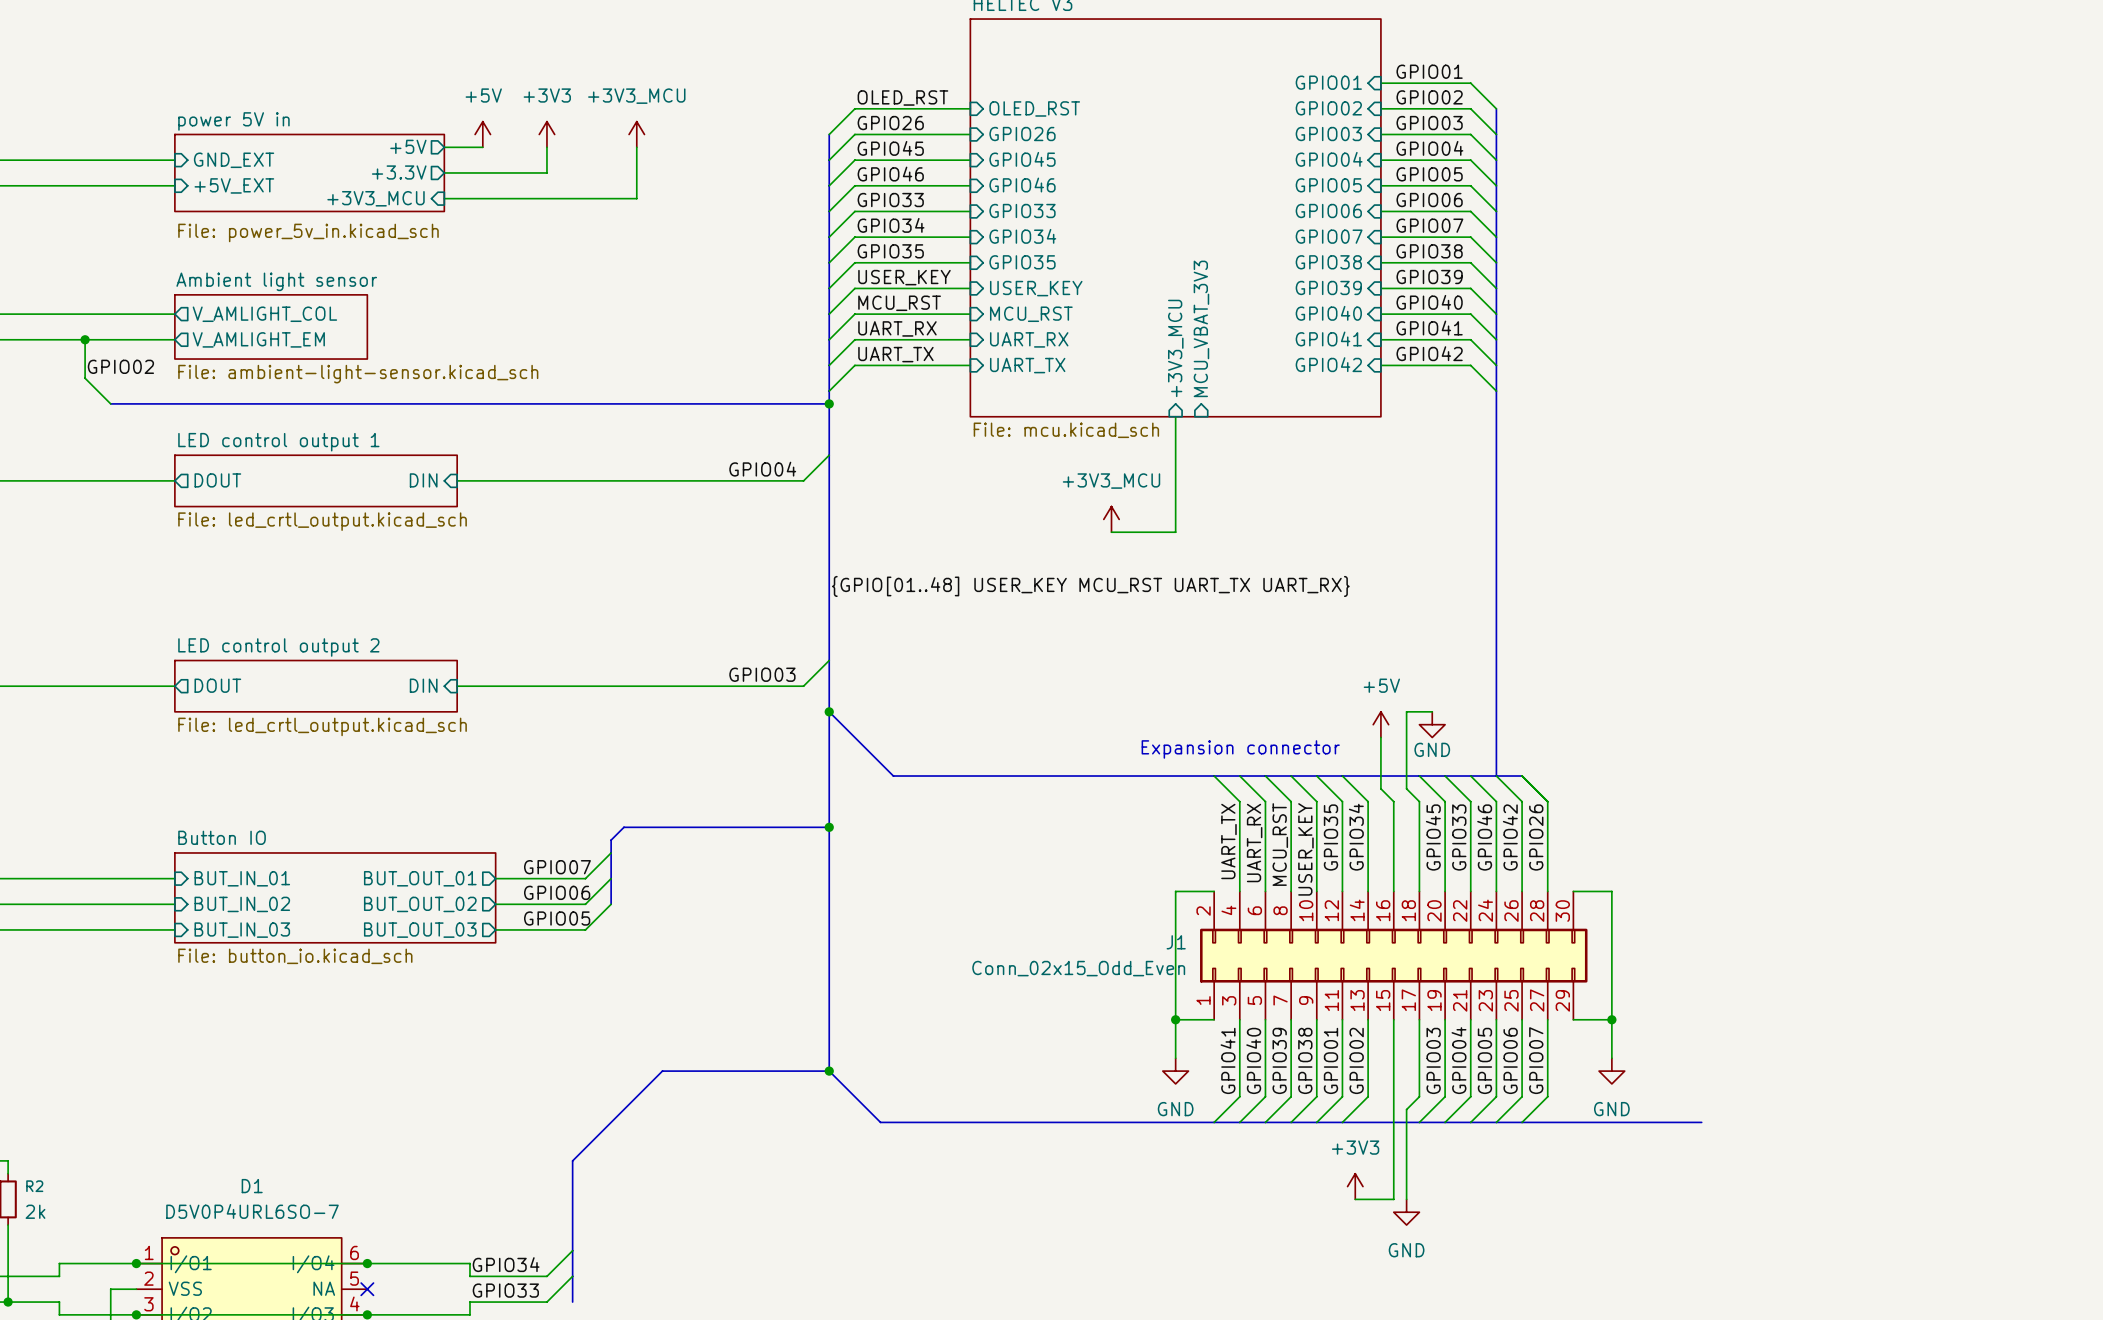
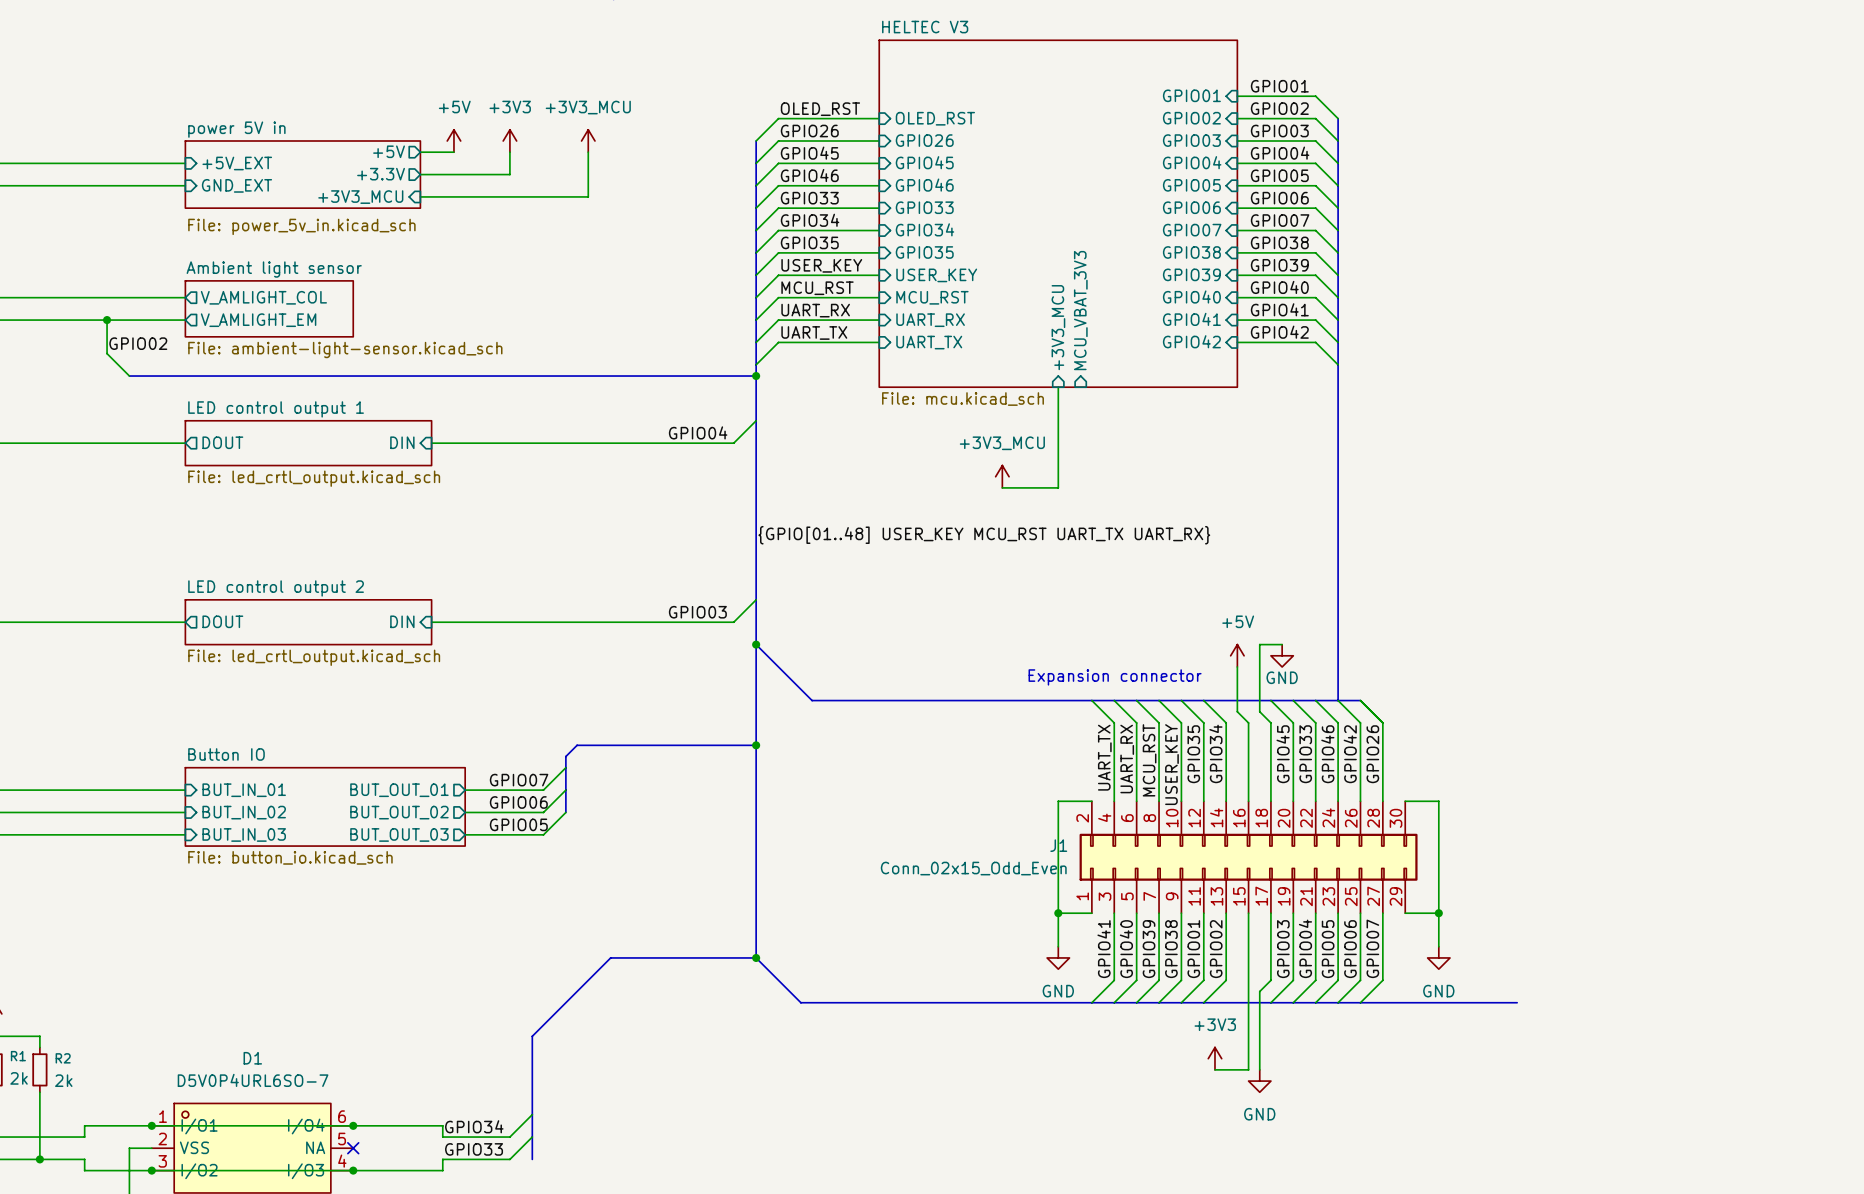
sheet pin: GND_EXT (234, 160) -> +5V_EXT (237, 163)
sheet pin: +5V_EXT (234, 185) -> GND_EXT (236, 185)

